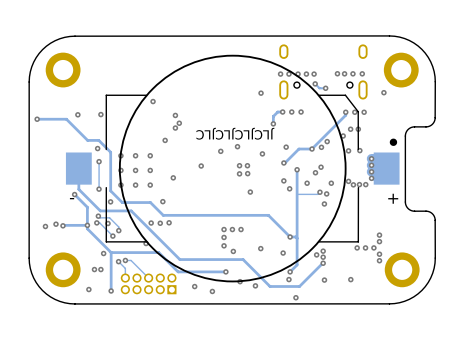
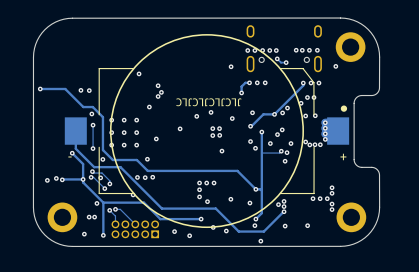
part: (63, 70) -> none
via: (77, 114) -> none
via: (100, 114) -> none
via: none -> (80, 90)
via: none -> (89, 90)

